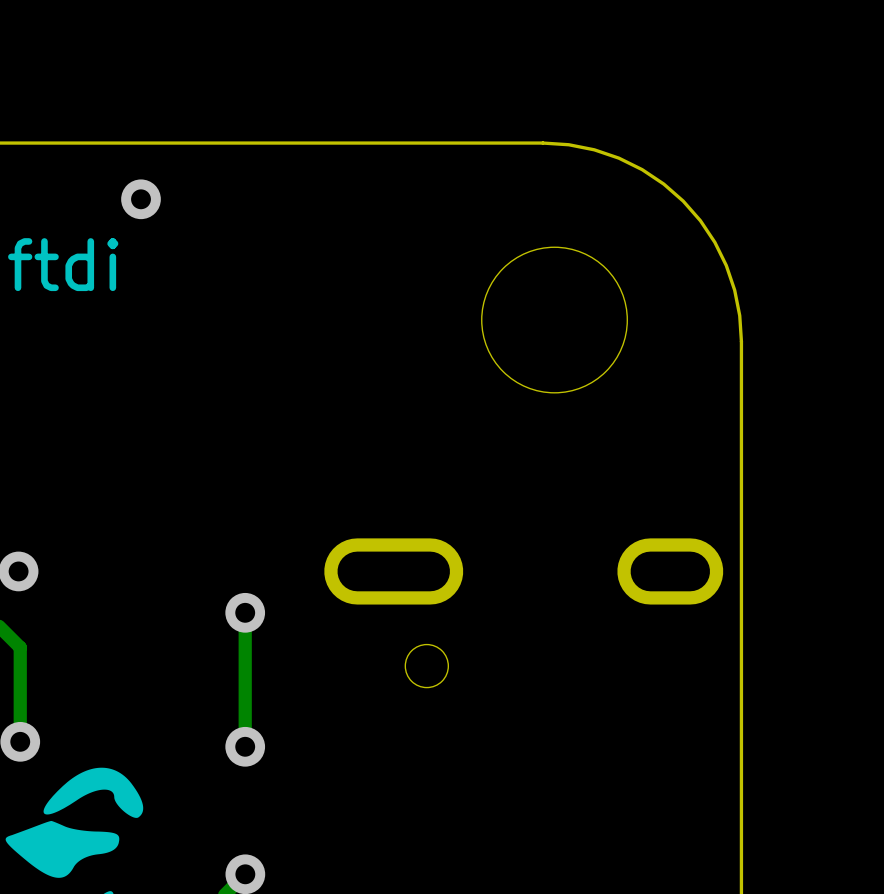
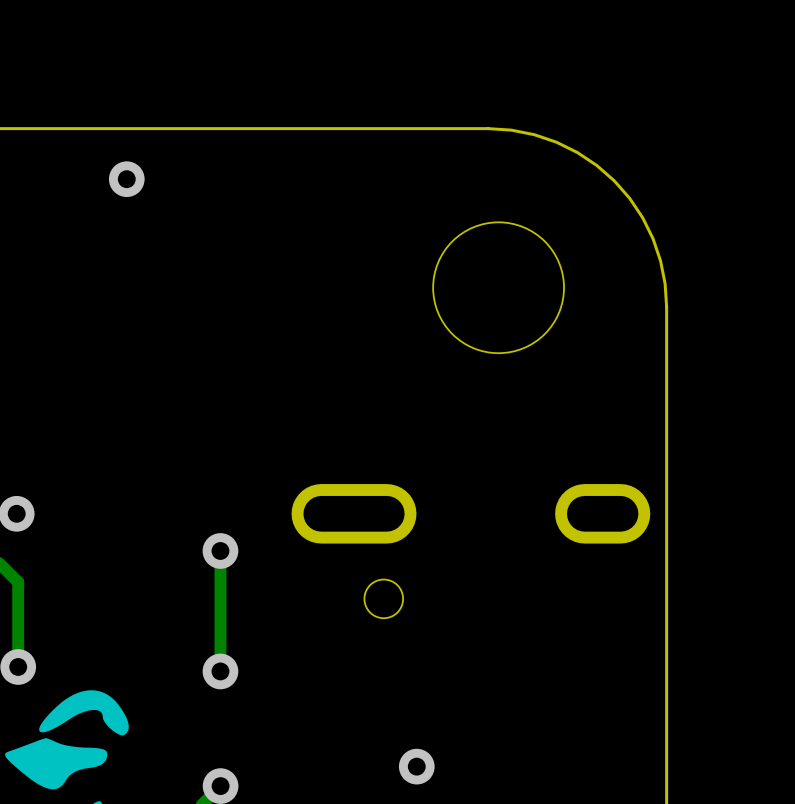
via: none -> (416, 766)

